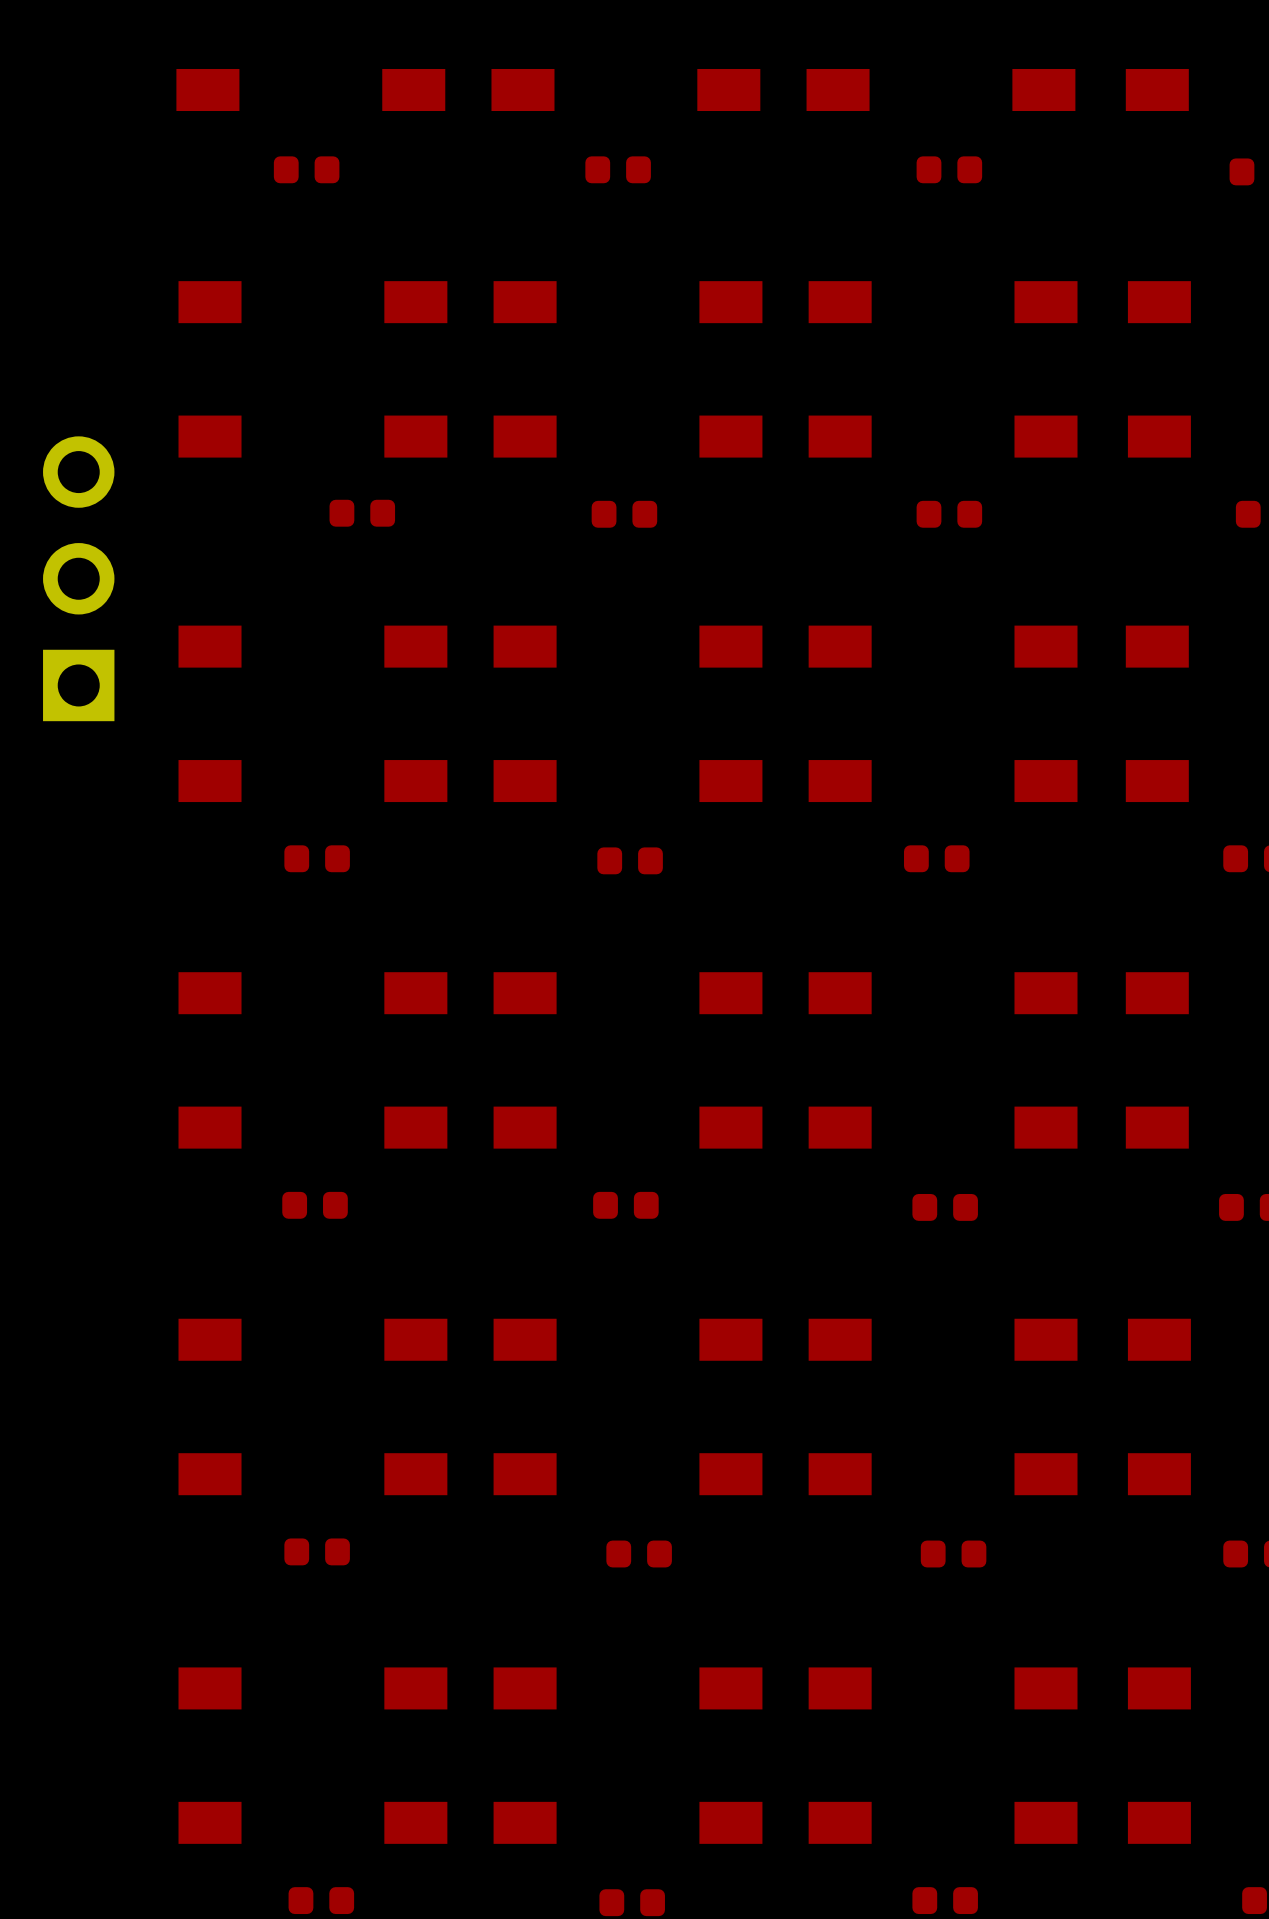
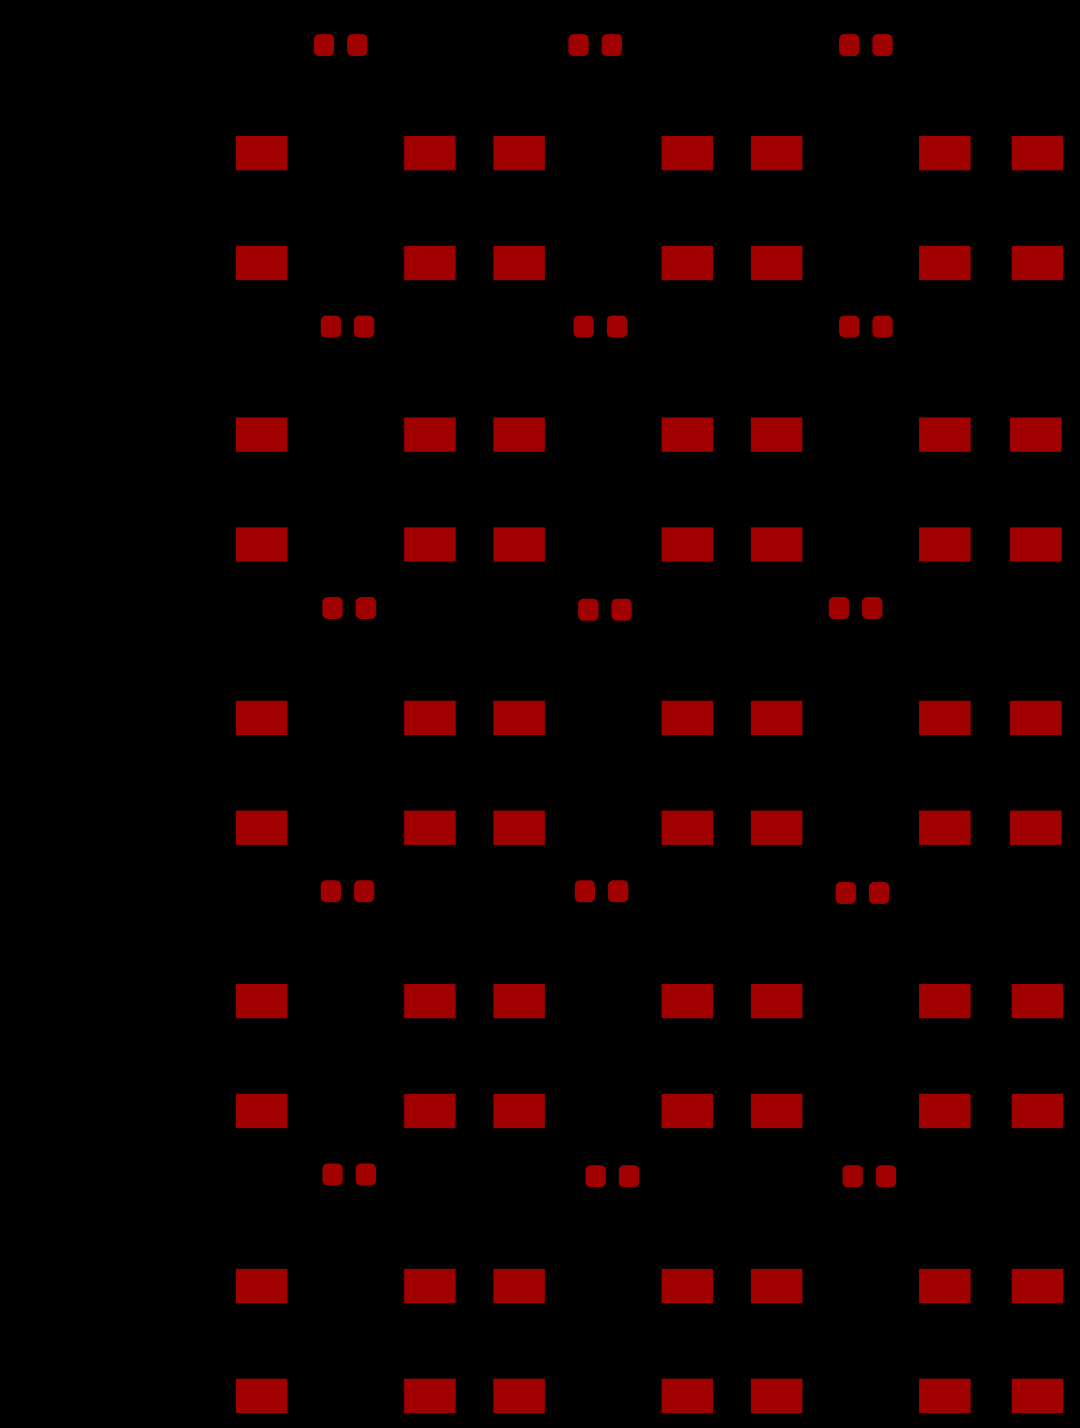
part position: (362, 513) -> (347, 326)
part: (78, 578) -> none

